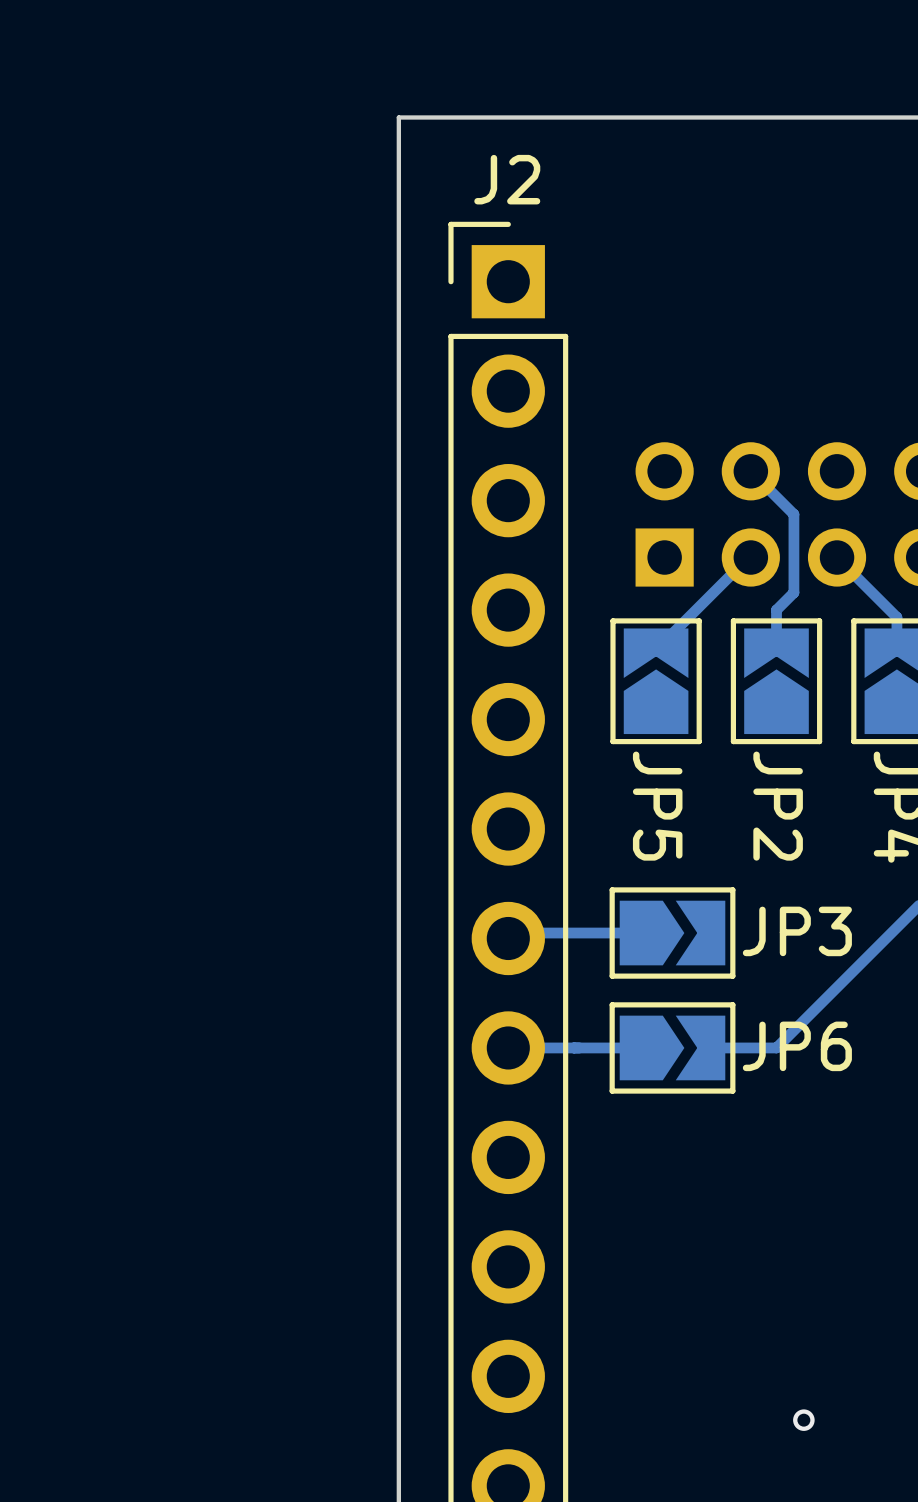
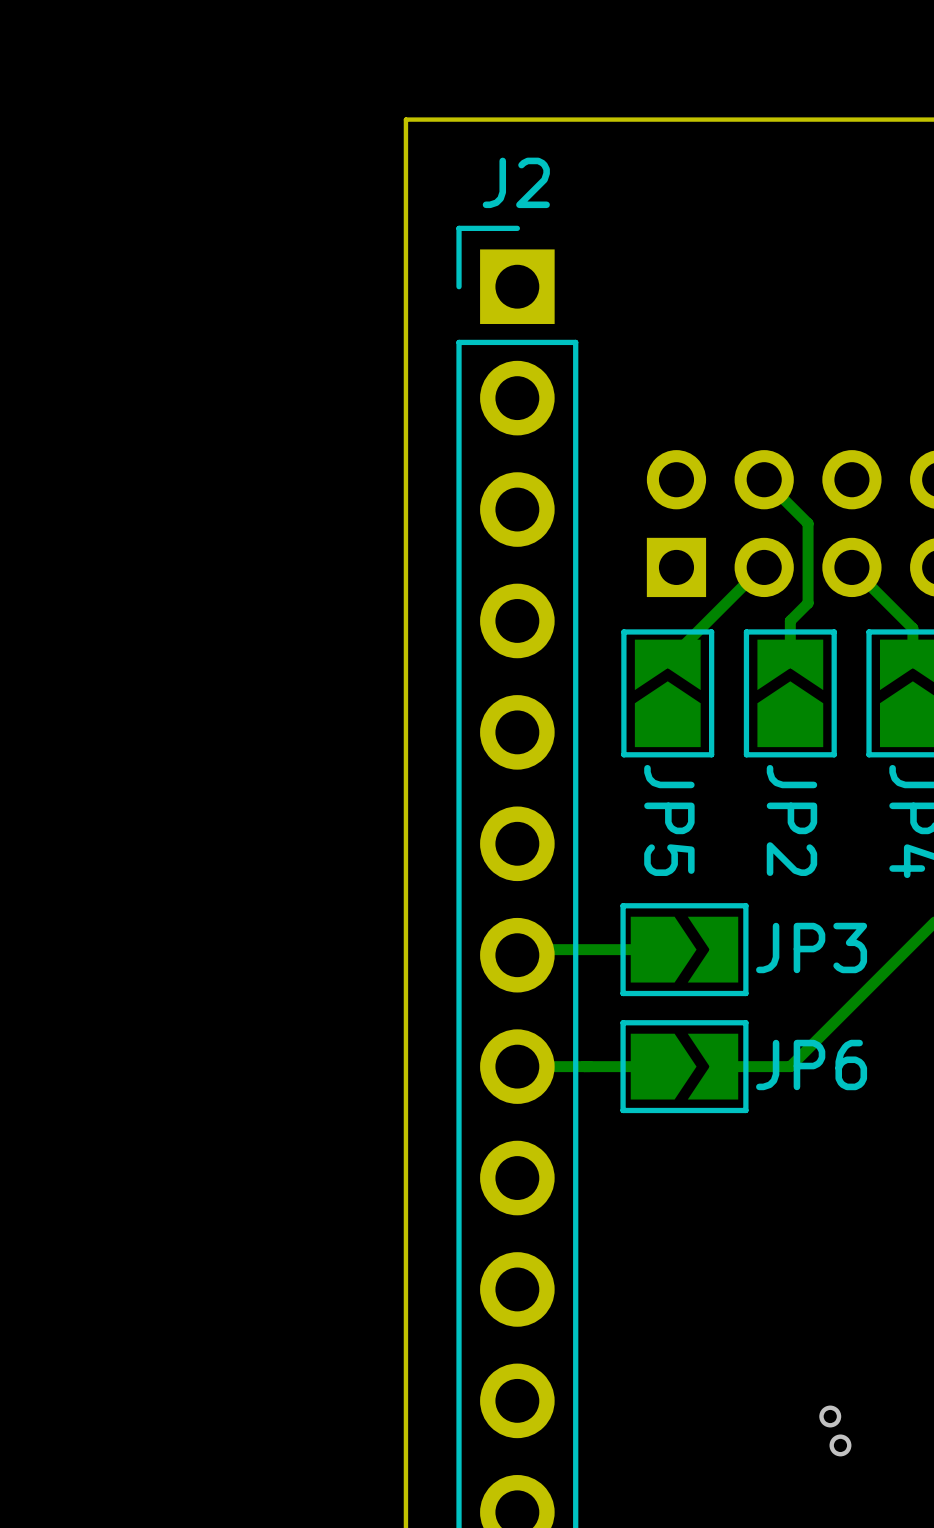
via: none -> (830, 1416)
via: (803, 1420) -> none
via: none -> (840, 1445)

